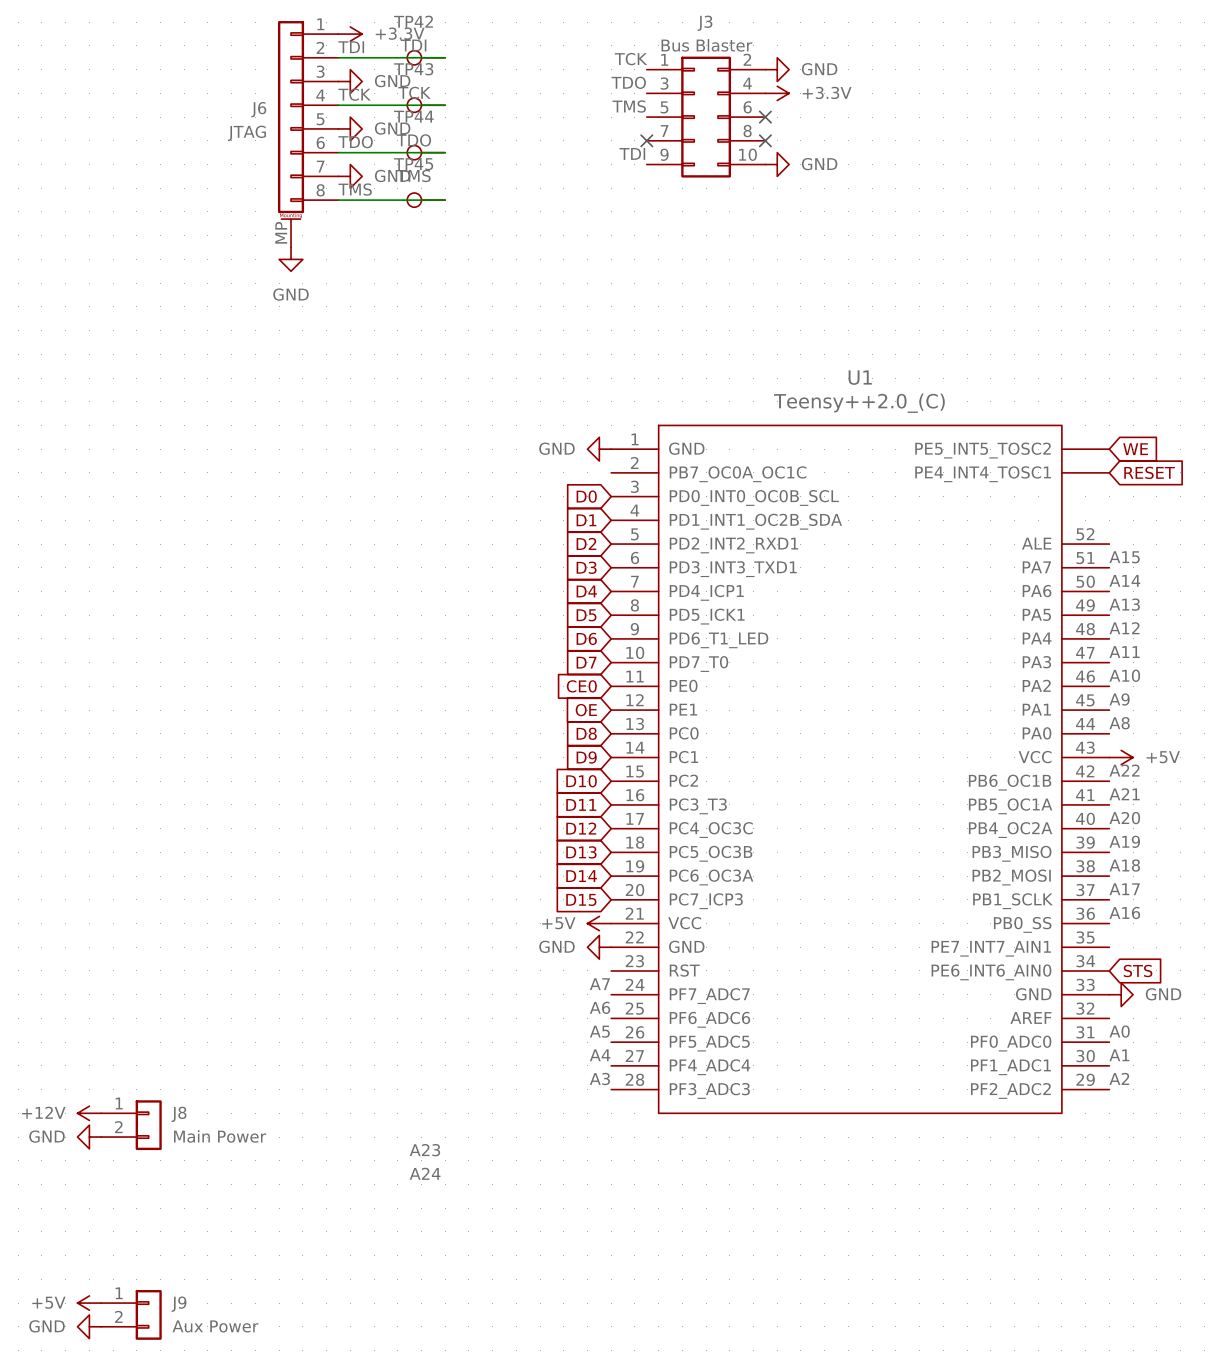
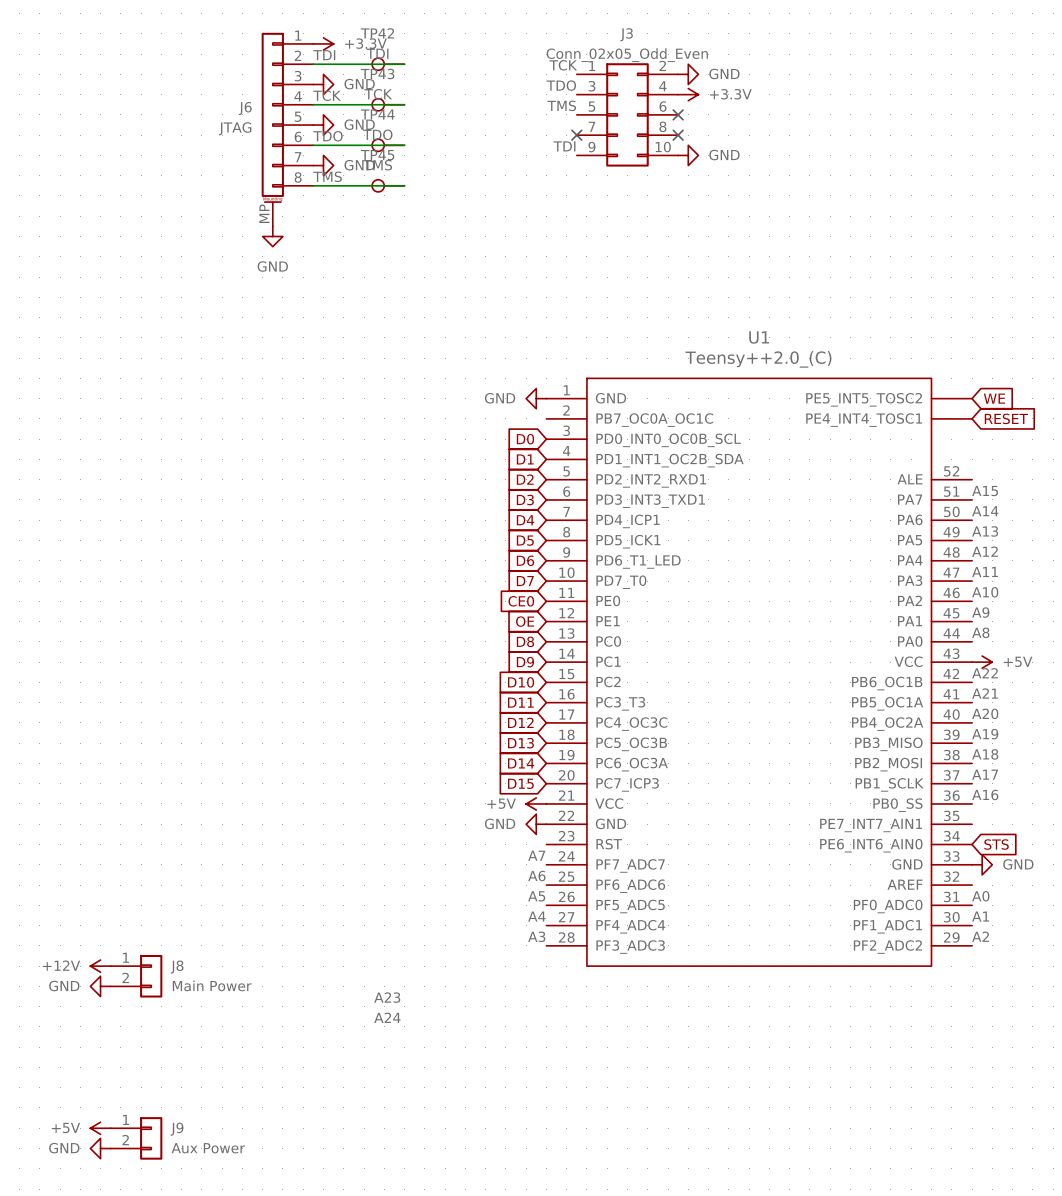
J3 value: Bus Blaster (706, 45) -> Conn_02x05_Odd_Even (627, 55)

